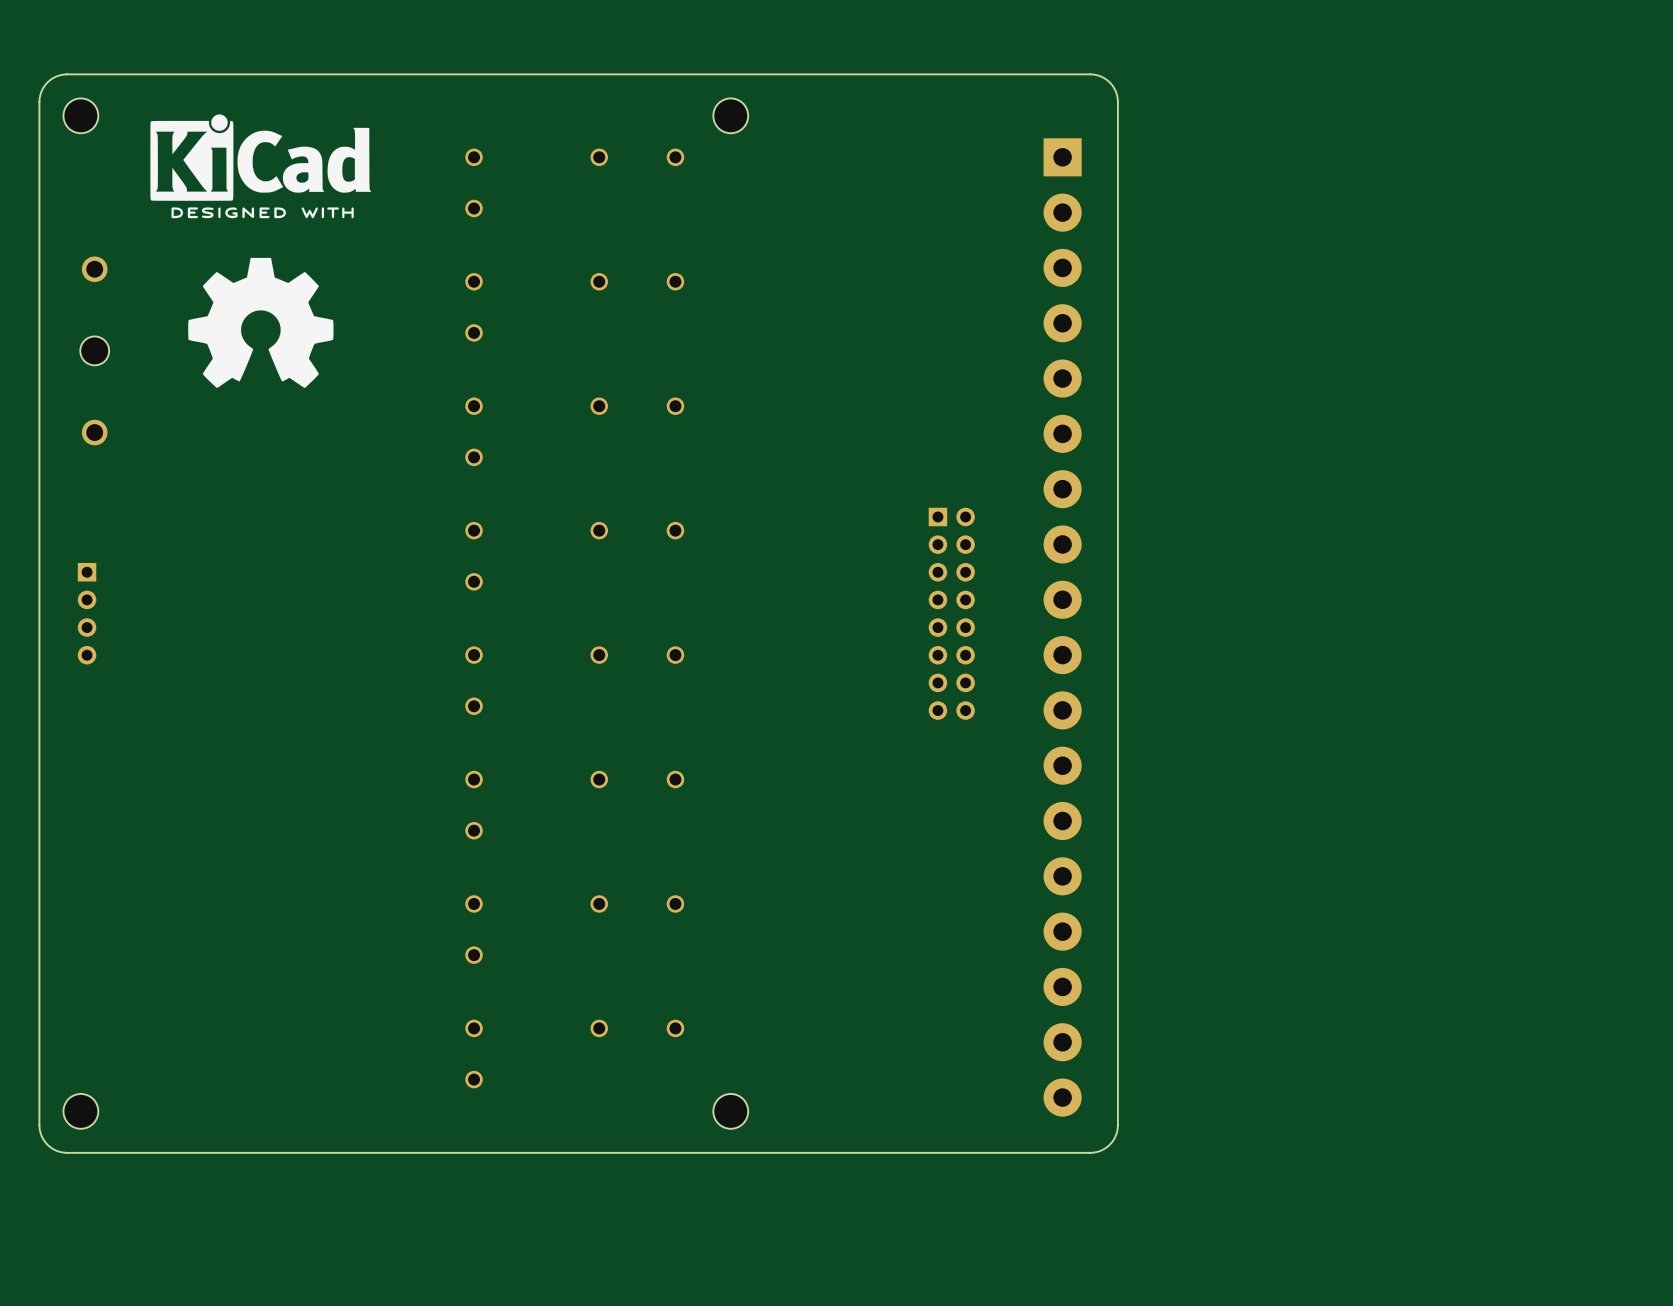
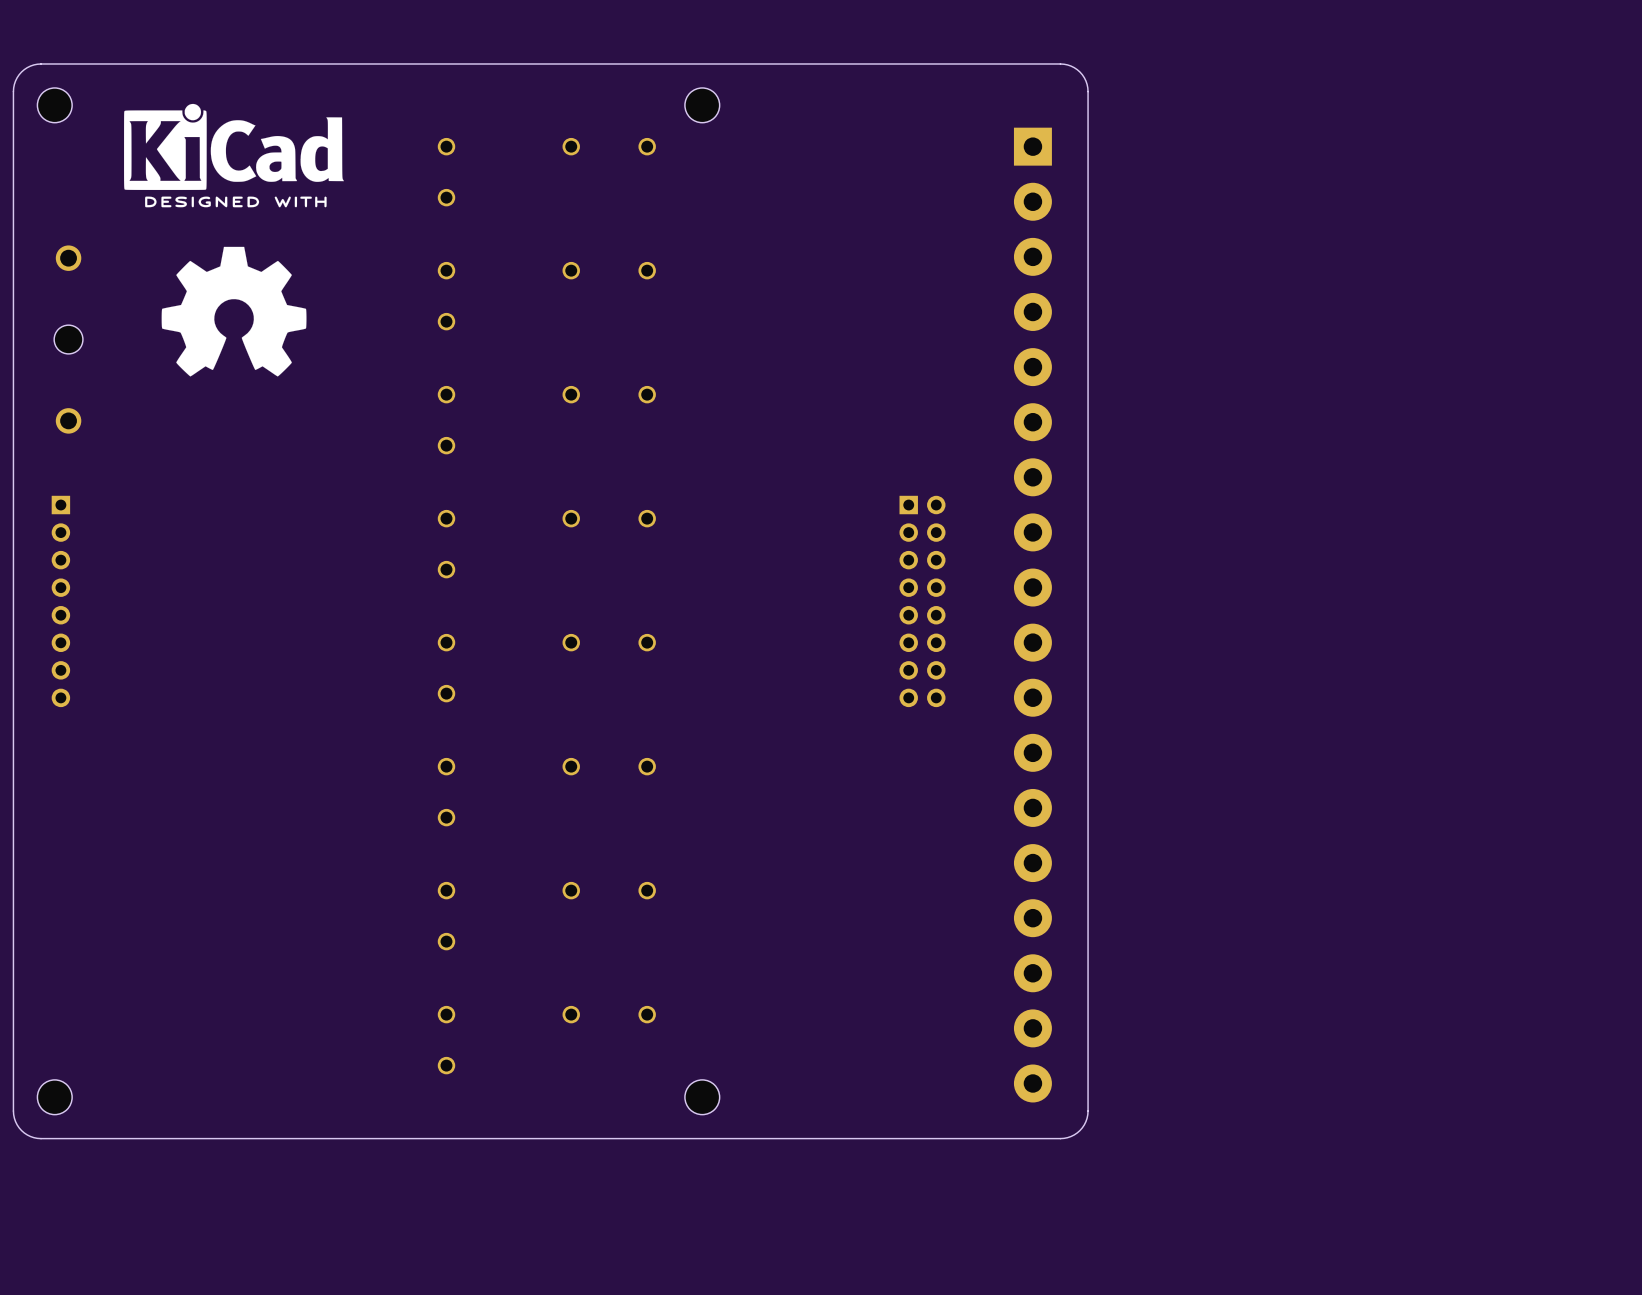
part footprint: [77, 562, 97, 665] -> [51, 495, 71, 708]

